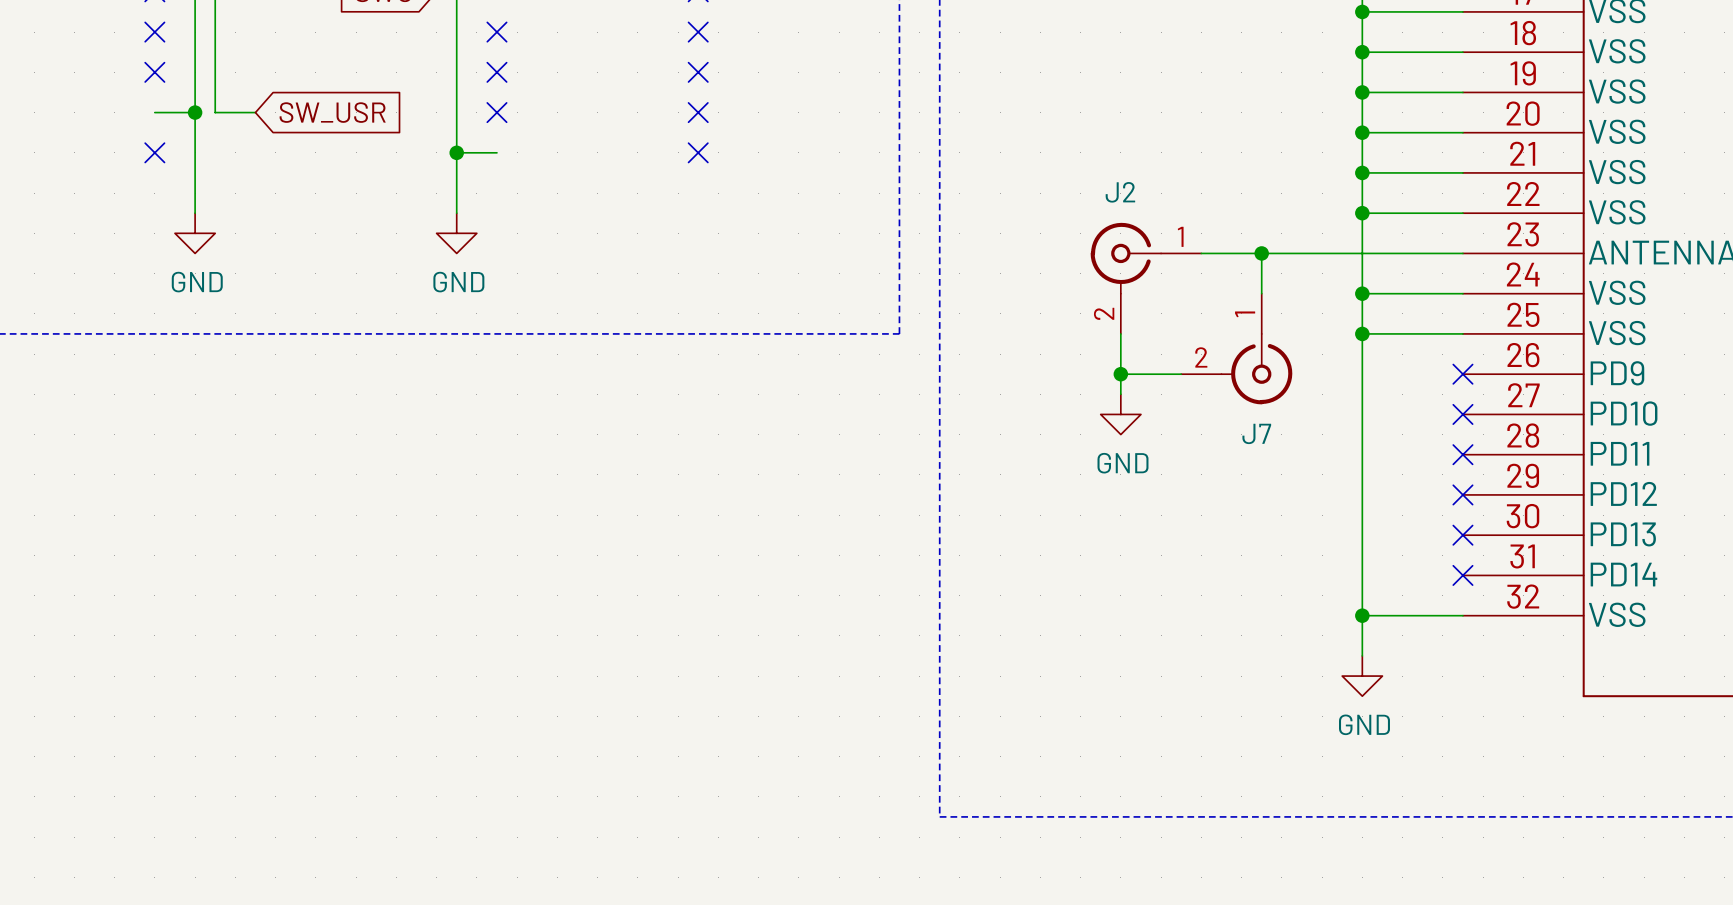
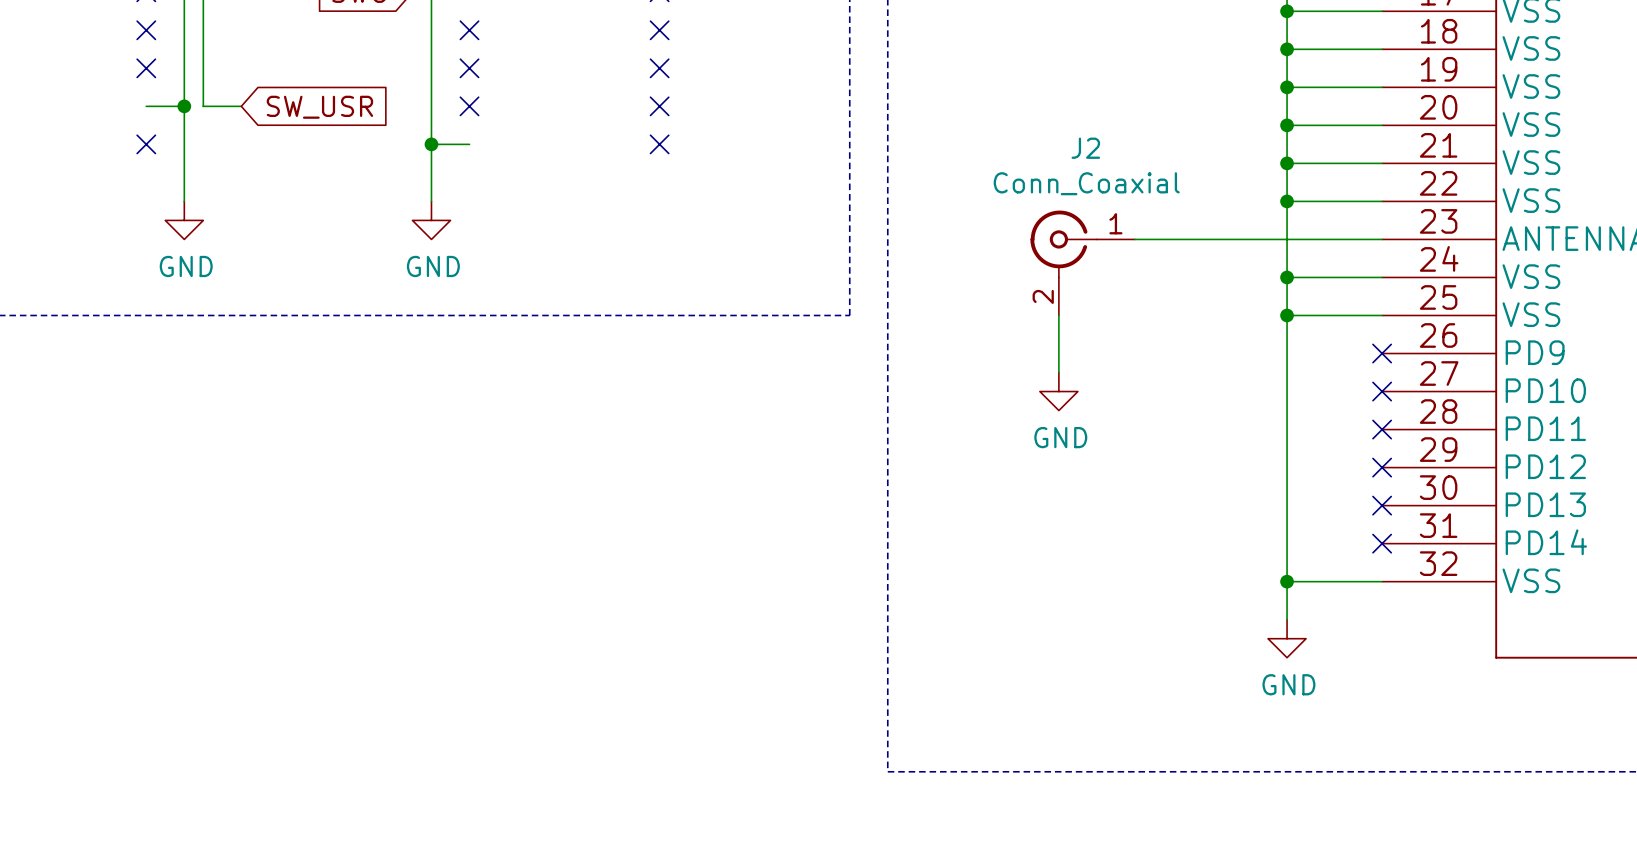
J2 name position: J2 (1120, 192) -> J2 (1085, 148)
J2 value: none -> Conn_Coaxial (1086, 183)
wire: (1261, 253) (1261, 293) -> none
junction: (1261, 253) -> none
J7: (1236, 349) -> none
wire: (1120, 374) (1181, 374) -> none
junction: (1120, 374) -> none

